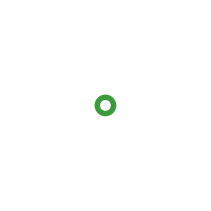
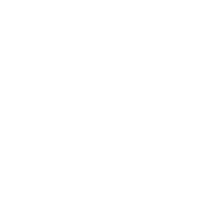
via: (105, 105) -> none

